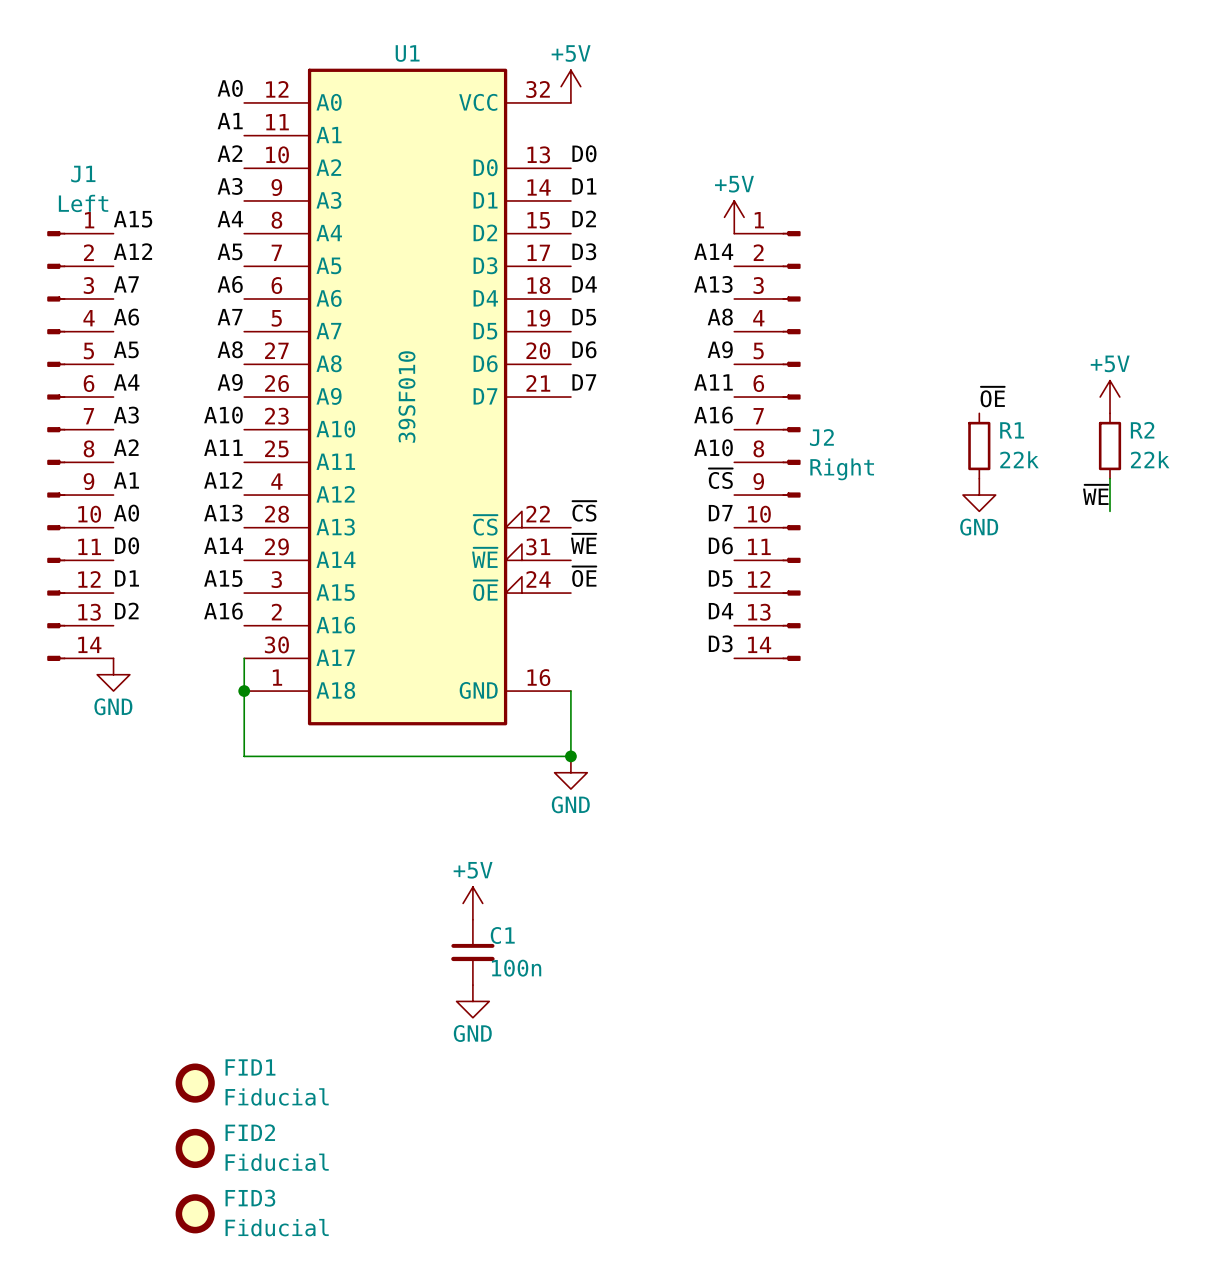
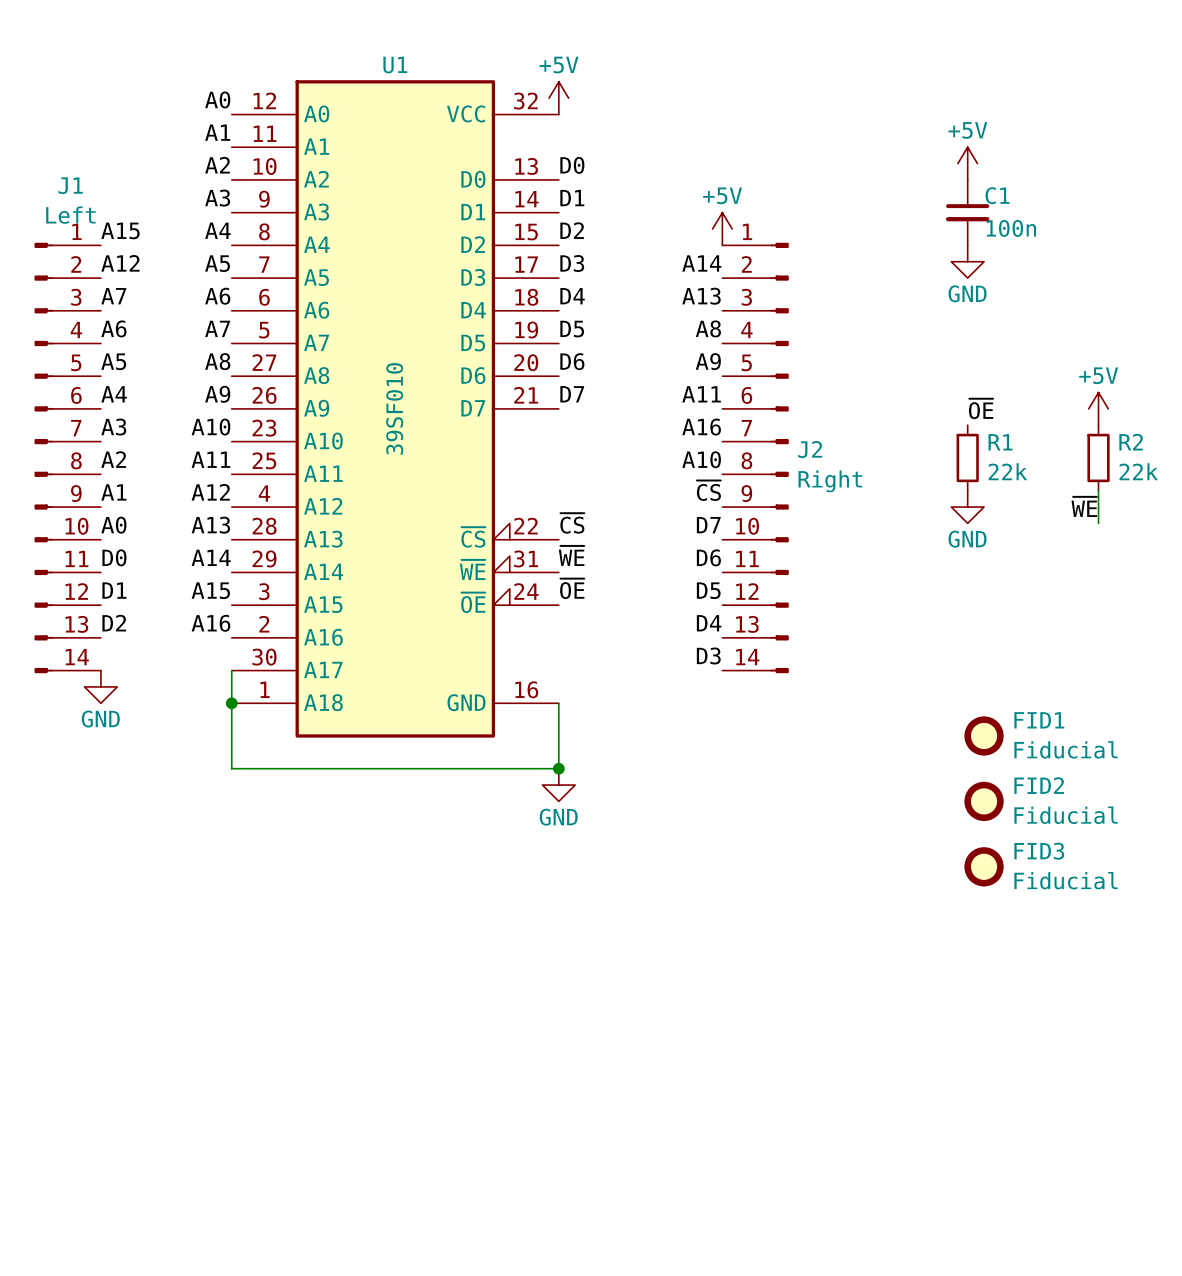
power symbol: none -> +5V (967, 163)
power symbol: none -> GND (967, 261)
power symbol: +5V (472, 903) -> none
C1 position: (472, 952) -> (967, 212)
power symbol: GND (472, 1001) -> none
FID1 position: (195, 1083) -> (984, 735)
FID2 position: (195, 1148) -> (984, 801)
FID3 position: (195, 1213) -> (984, 866)

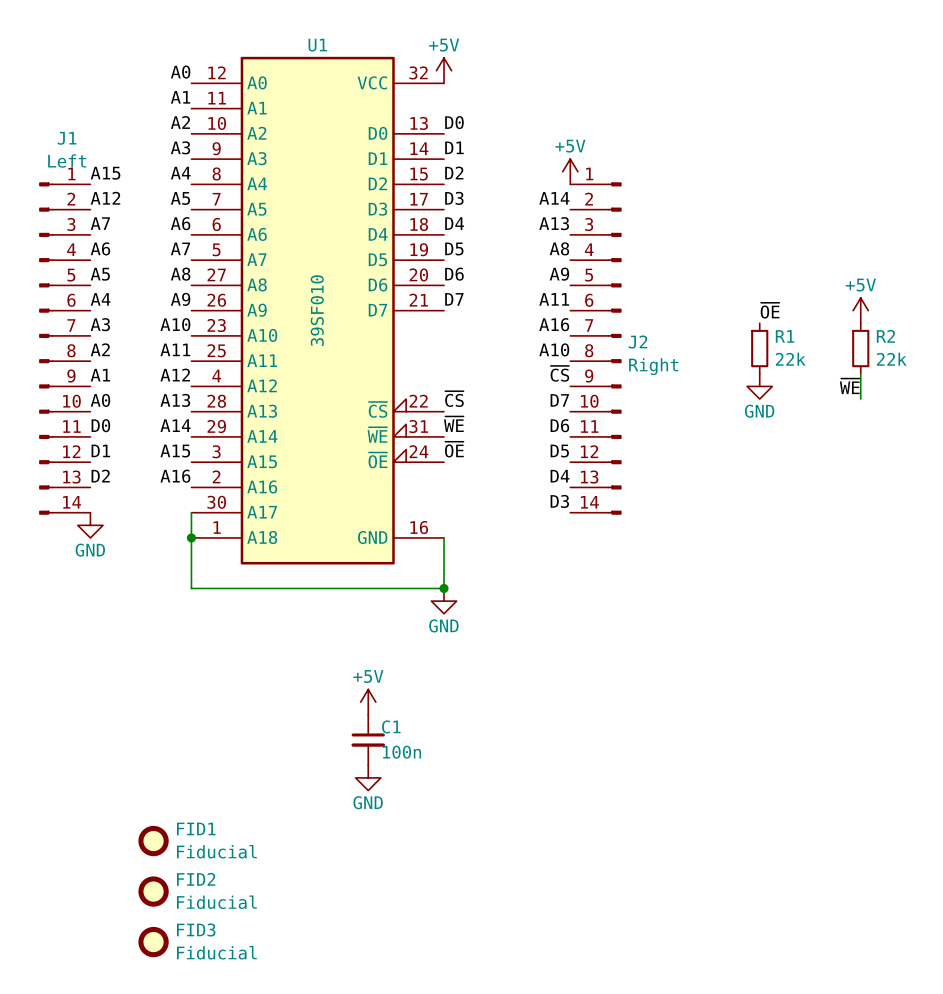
power symbol: +5V (967, 163) -> none
C1 position: (967, 212) -> (368, 740)
power symbol: GND (967, 261) -> none
FID1 position: (984, 735) -> (153, 841)
FID2 position: (984, 801) -> (153, 891)
FID3 position: (984, 866) -> (153, 942)
power symbol: none -> +5V (368, 702)
power symbol: none -> GND (368, 777)

